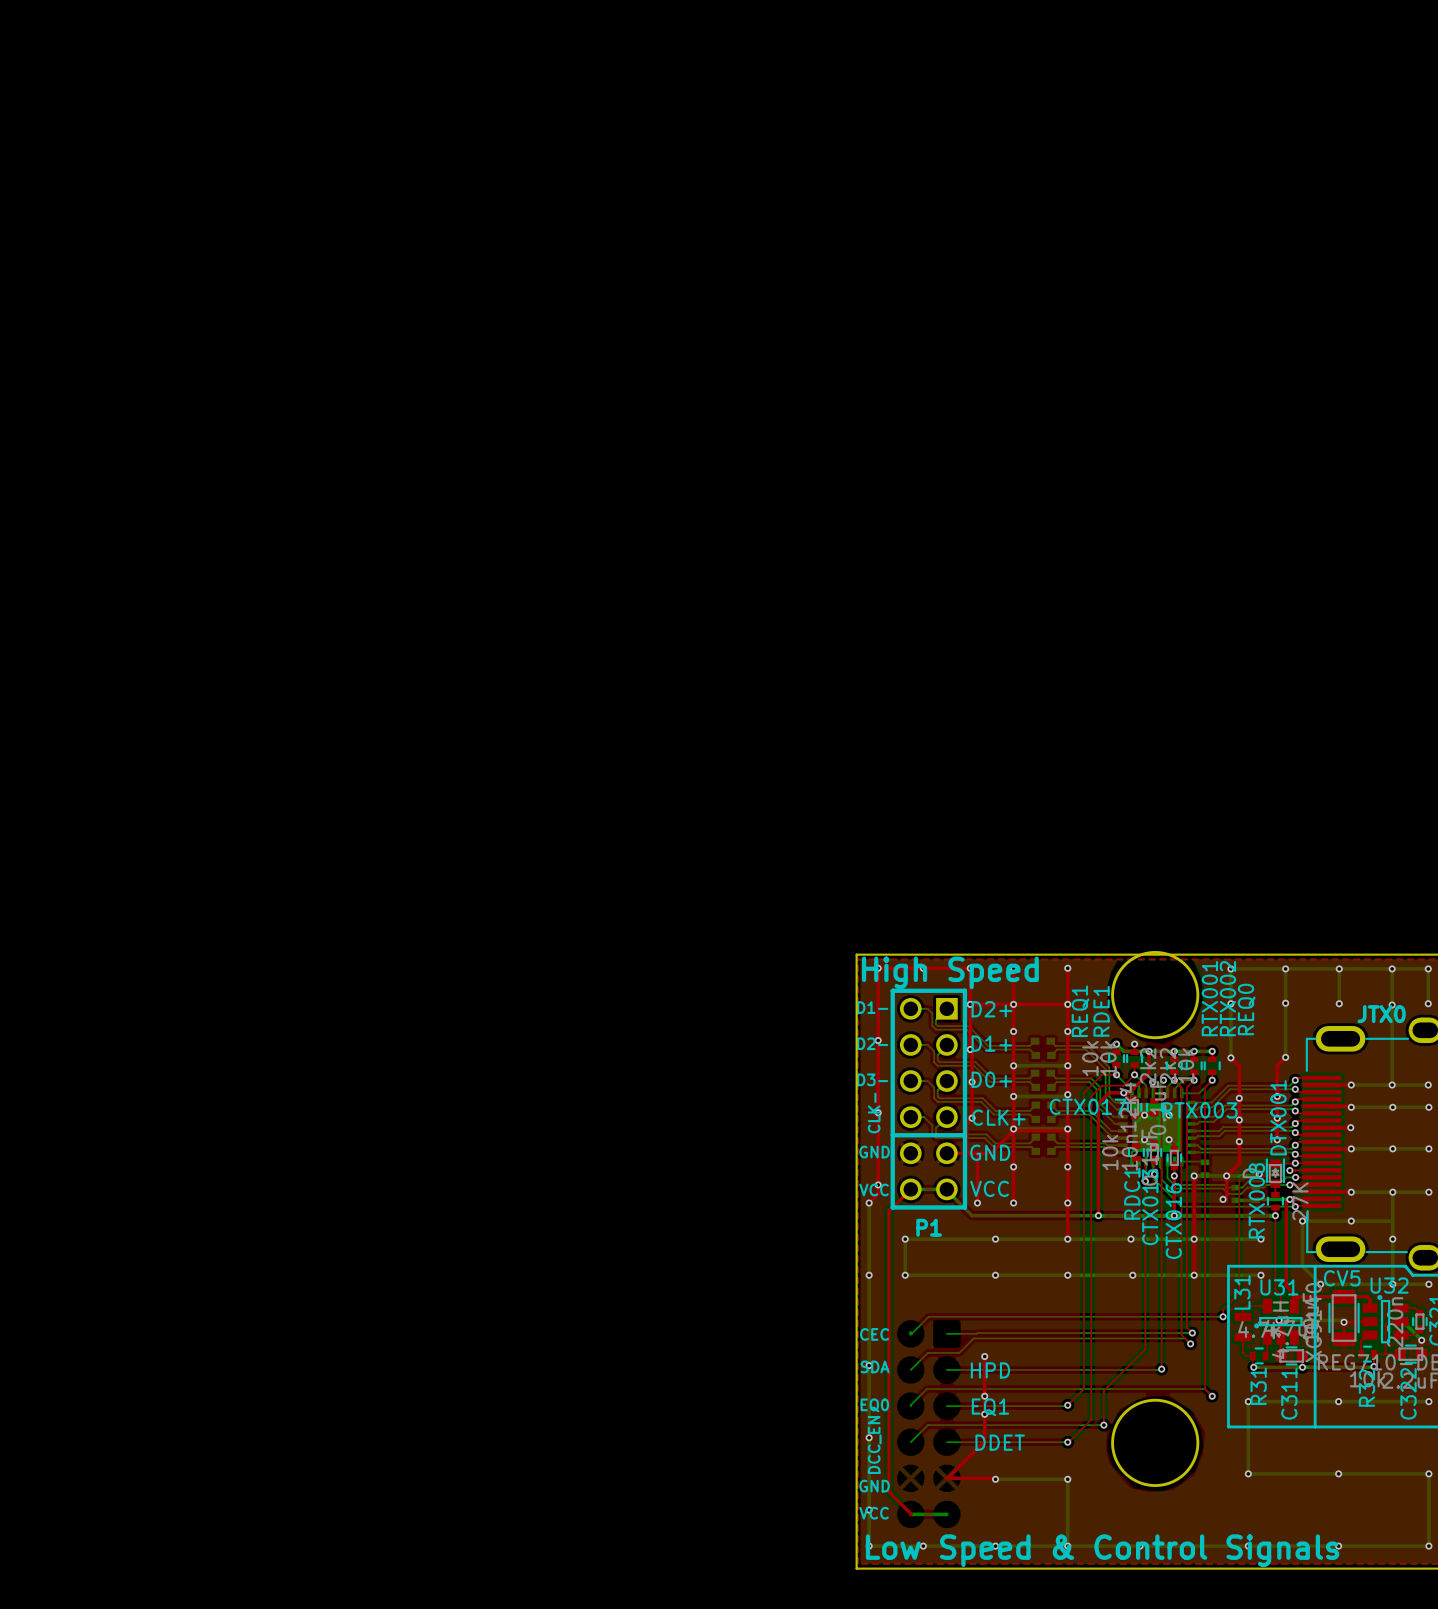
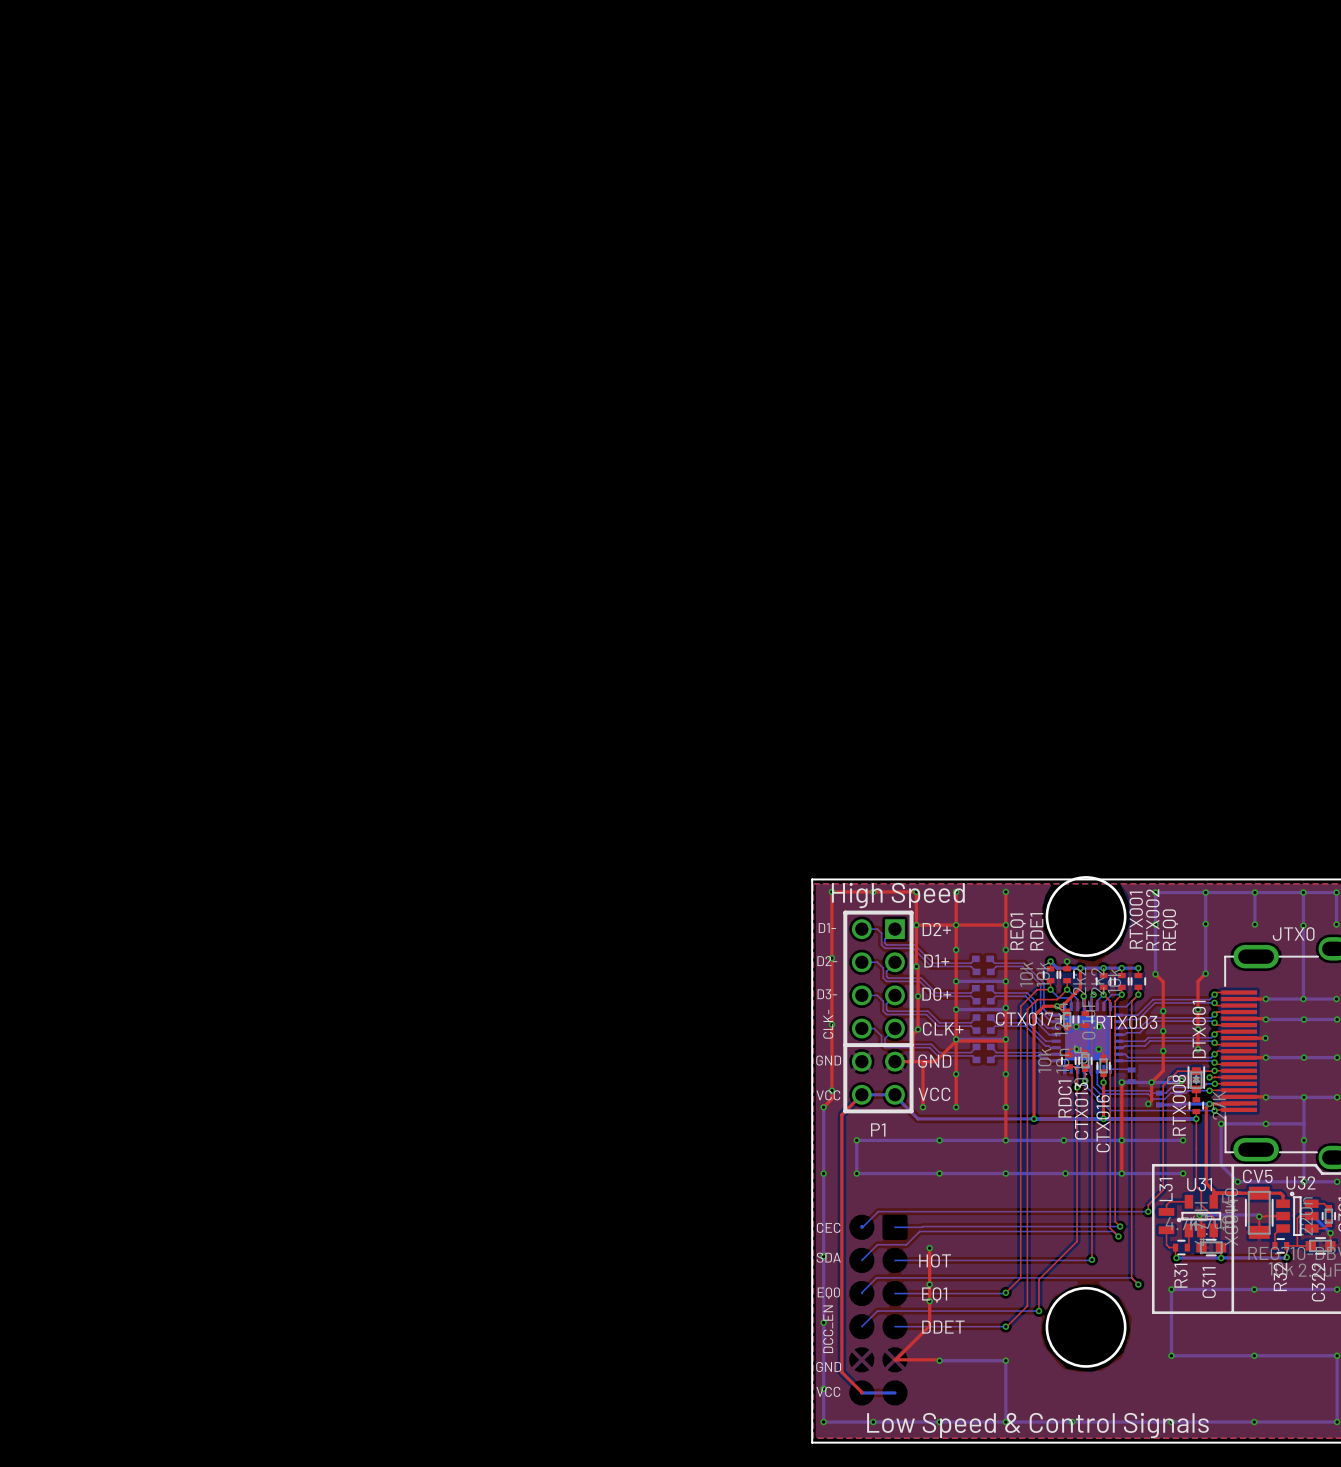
text: HPD (990, 1370) -> HOT (935, 1260)

